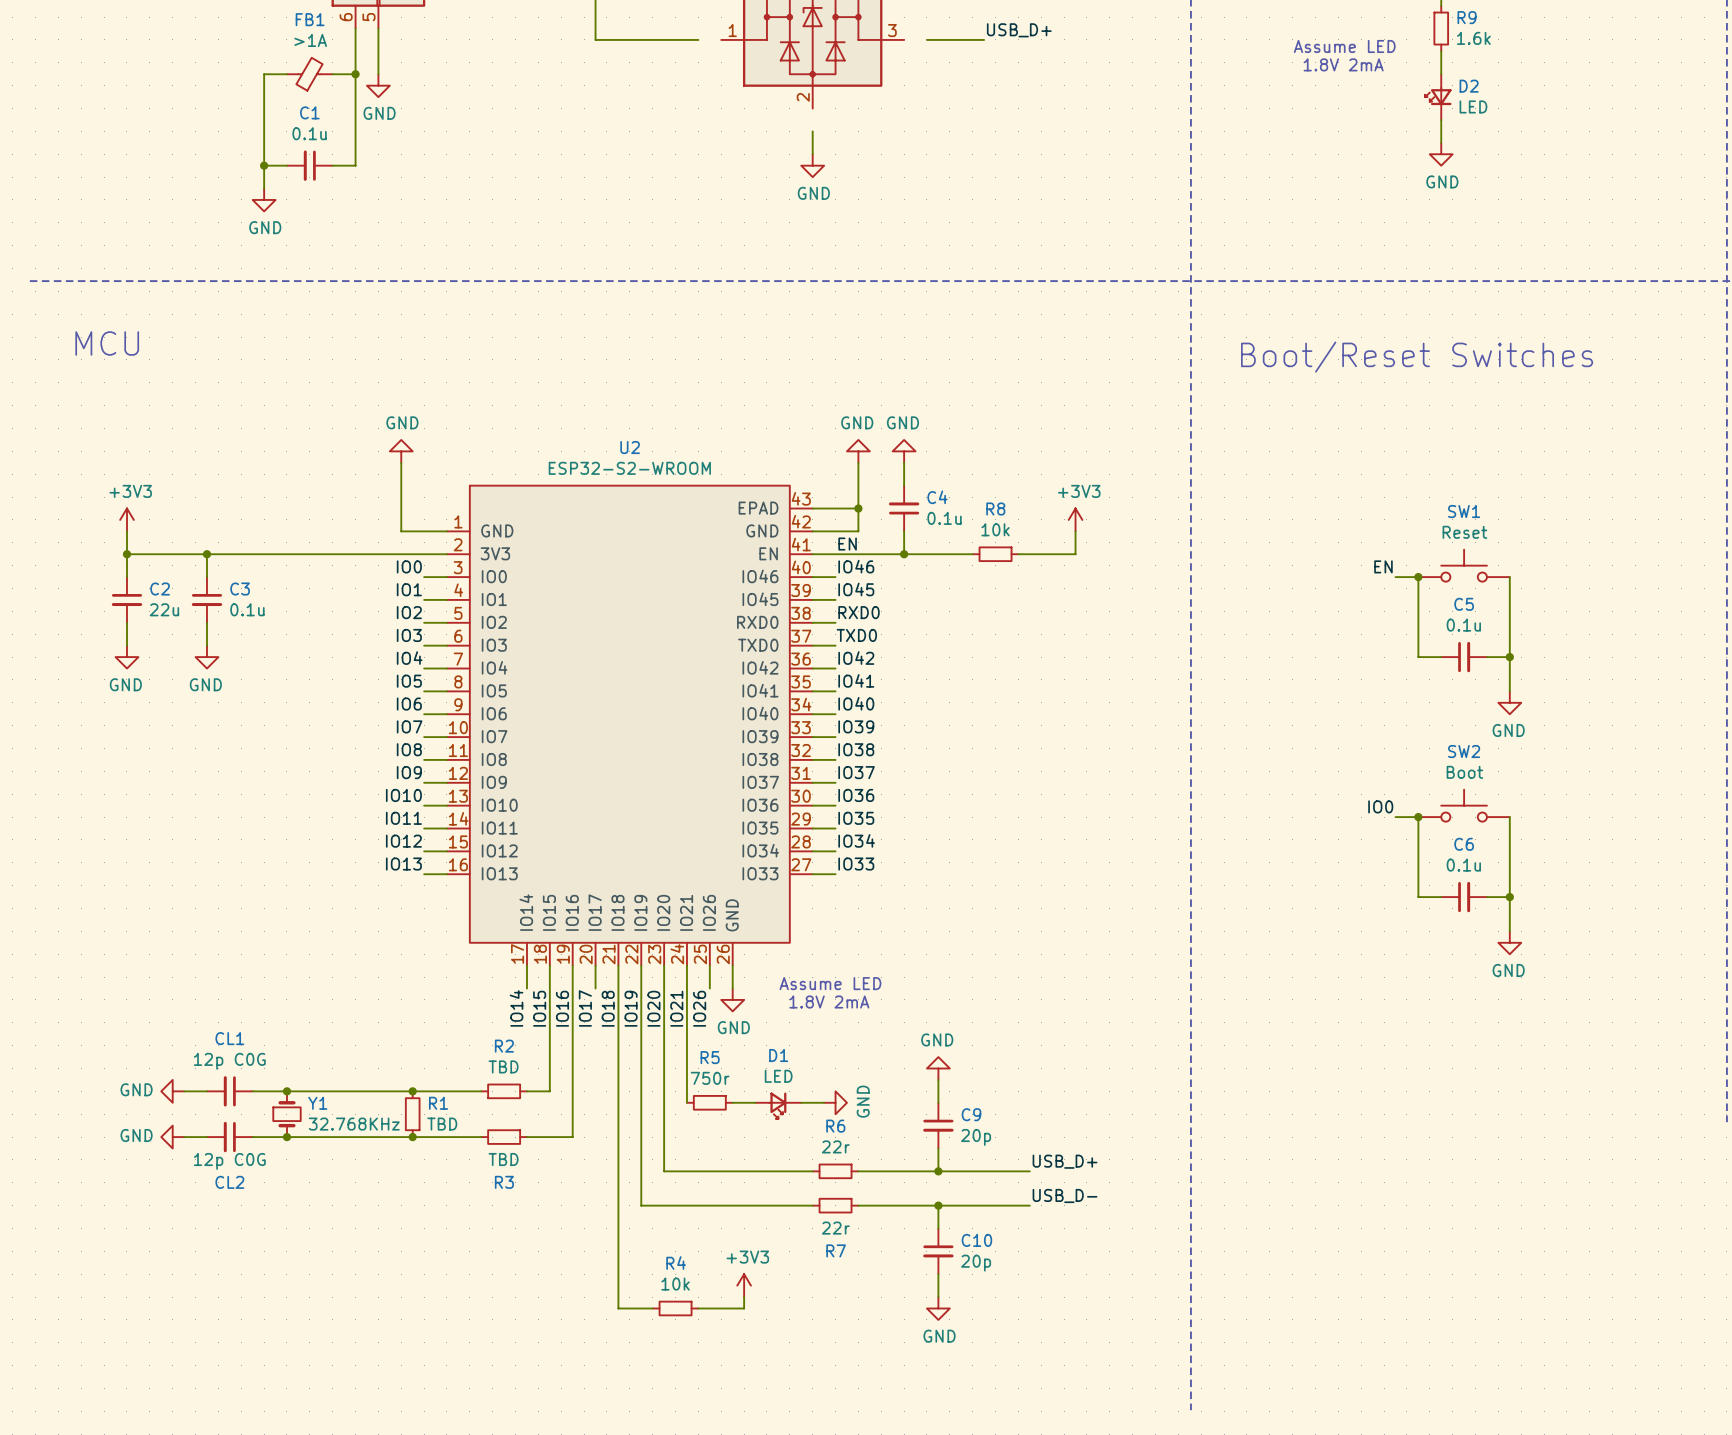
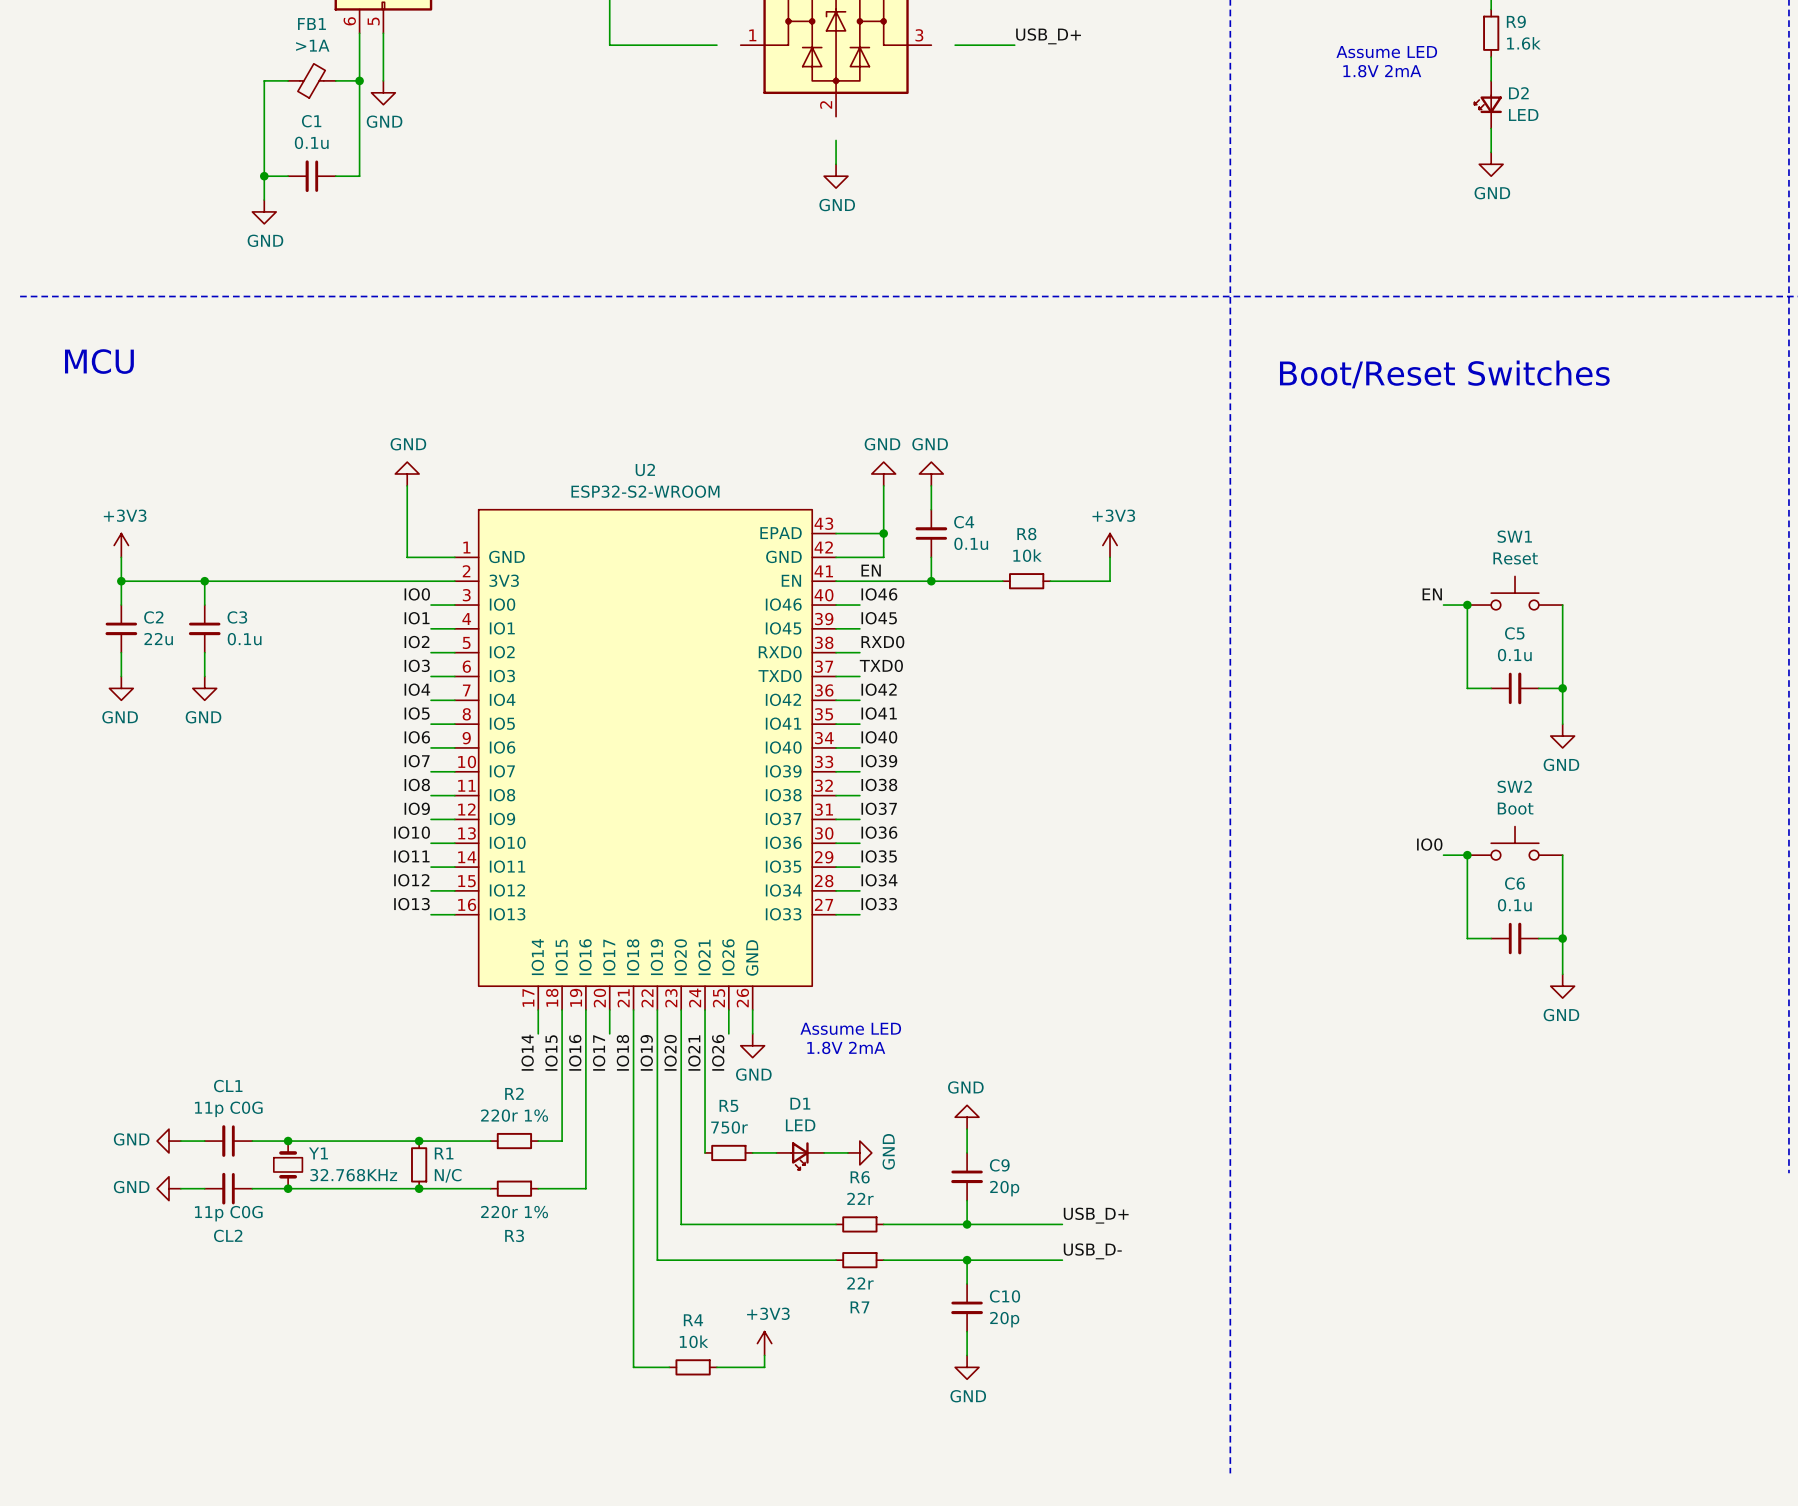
CL1 value: 12p C0G (229, 1061) -> 11p C0G (228, 1109)
R2 value: TBD (503, 1066) -> 220r 1% (514, 1115)
R1 value: TBD (442, 1124) -> N/C (448, 1175)
R3 value: TBD (503, 1159) -> 220r 1% (514, 1212)
CL2 value: 12p C0G (229, 1161) -> 11p C0G (228, 1213)

